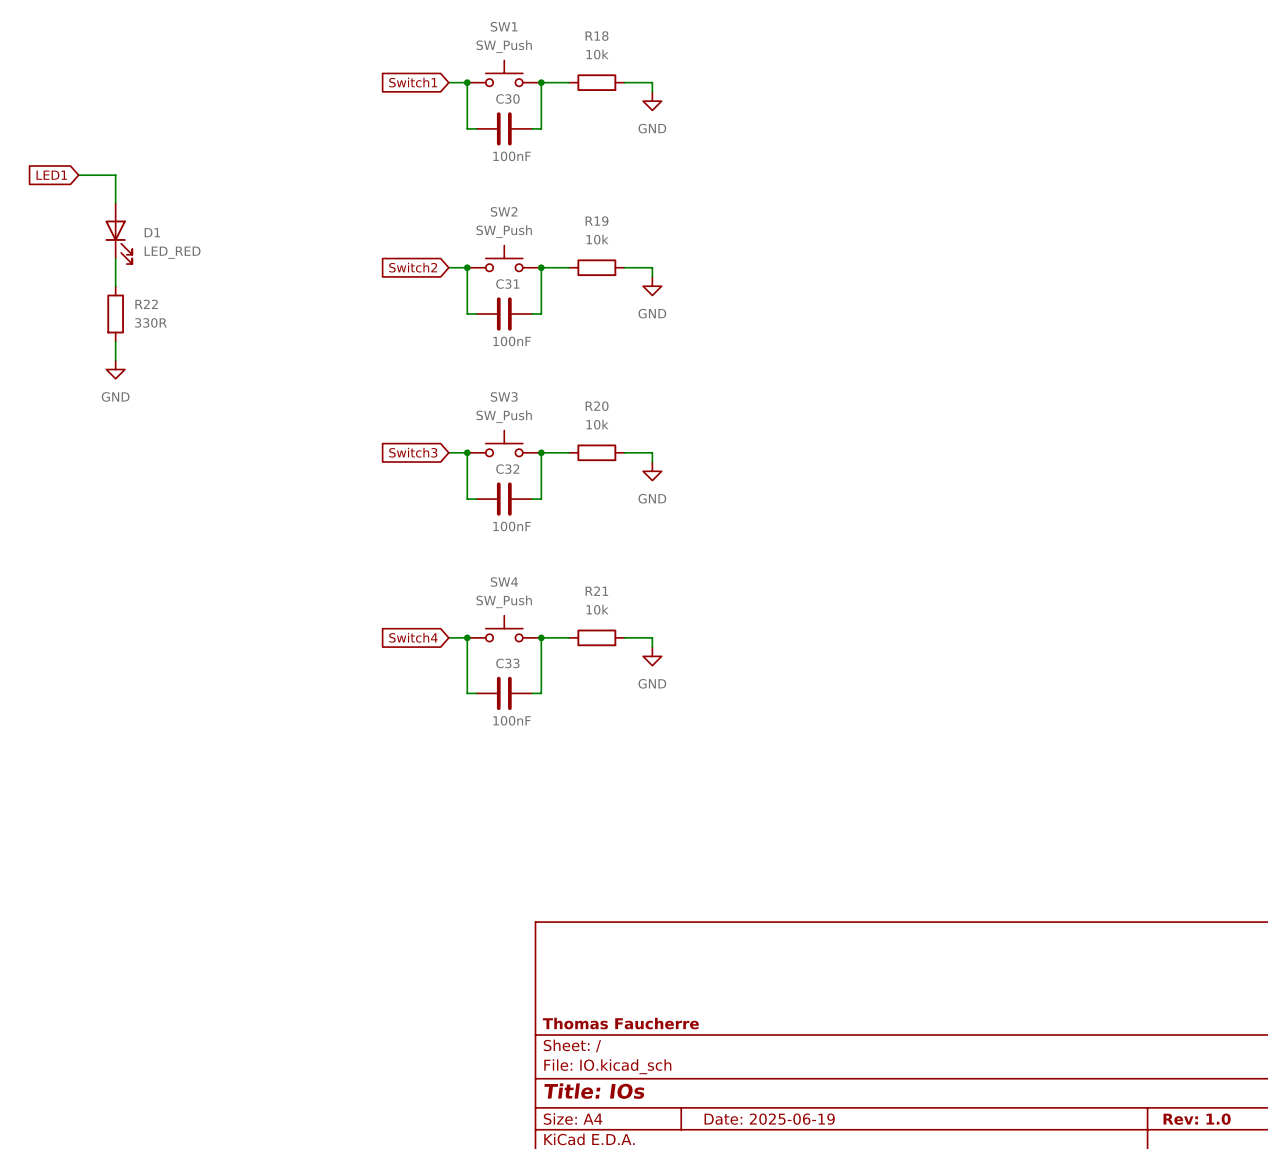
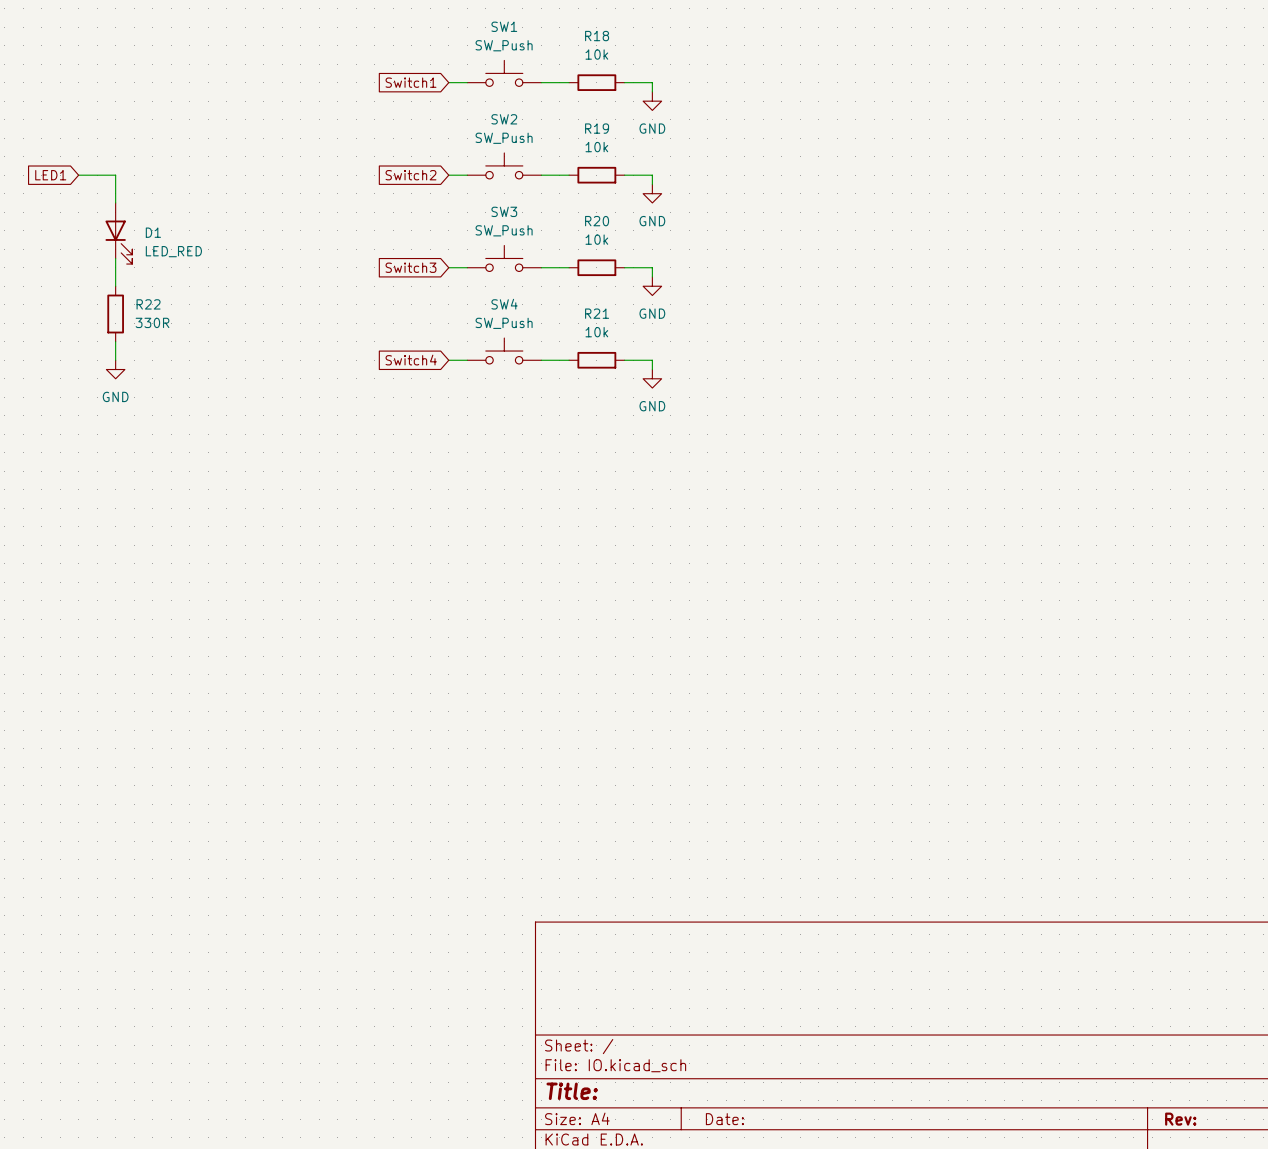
wire: (467, 82) (467, 128) (476, 128) -> none
junction: (467, 82) -> none
wire: (541, 82) (541, 128) (532, 128) -> none
junction: (541, 82) -> none
C30: 100nF (504, 128) -> none
SW2: none -> SW_Push (504, 165)
global label: none -> Switch2 (410, 175)
wire: none -> (448, 175) (467, 175)
wire: none -> (541, 175) (569, 175)
R19: none -> 10k (596, 175)
wire: none -> (624, 175) (652, 175) (652, 184)
power symbol: none -> GND (652, 193)
SW2 name: SW2 (504, 211) -> SW3 (504, 211)
R19 name: R19 (597, 221) -> R20 (597, 221)
global label: Switch2 (413, 267) -> Switch3 (410, 267)
wire: (467, 267) (467, 314) (476, 314) -> none
junction: (467, 267) -> none
wire: (541, 267) (541, 314) (532, 314) -> none
junction: (541, 267) -> none
C31: 100nF (504, 314) -> none
global label: none -> Switch4 (411, 360)
wire: none -> (448, 360) (467, 360)
wire: none -> (541, 360) (569, 360)
SW3: SW_Push (504, 443) -> none
global label: Switch3 (413, 452) -> none
wire: (448, 452) (467, 452) (467, 499) (476, 499) -> none
junction: (467, 452) -> none
junction: (541, 452) -> none
wire: (569, 452) (541, 452) (541, 499) (532, 499) -> none
R20: 10k (596, 452) -> none
wire: (624, 452) (652, 452) (652, 462) -> (624, 360) (652, 360) (652, 369)
power symbol position: GND (652, 471) -> GND (652, 378)
C32: 100nF (504, 499) -> none
SW4 position: (504, 628) -> (504, 351)
global label: Switch4 (413, 637) -> none
wire: (448, 637) (467, 637) (467, 693) (476, 693) -> none
junction: (467, 637) -> none
junction: (541, 637) -> none
wire: (569, 637) (541, 637) (541, 693) (532, 693) -> none
R21 position: (596, 637) -> (596, 360)
wire: (624, 637) (652, 637) (652, 647) -> none
power symbol: GND (652, 656) -> none
C33: 100nF (504, 693) -> none
title block: Thomas Faucherre (620, 1023) -> none
title block: Title: IOs (594, 1091) -> Title: (572, 1091)
title block: Date: 2025-06-19 (769, 1119) -> Date: (724, 1119)
title block: Rev: 1.0 (1197, 1119) -> Rev: (1180, 1119)

